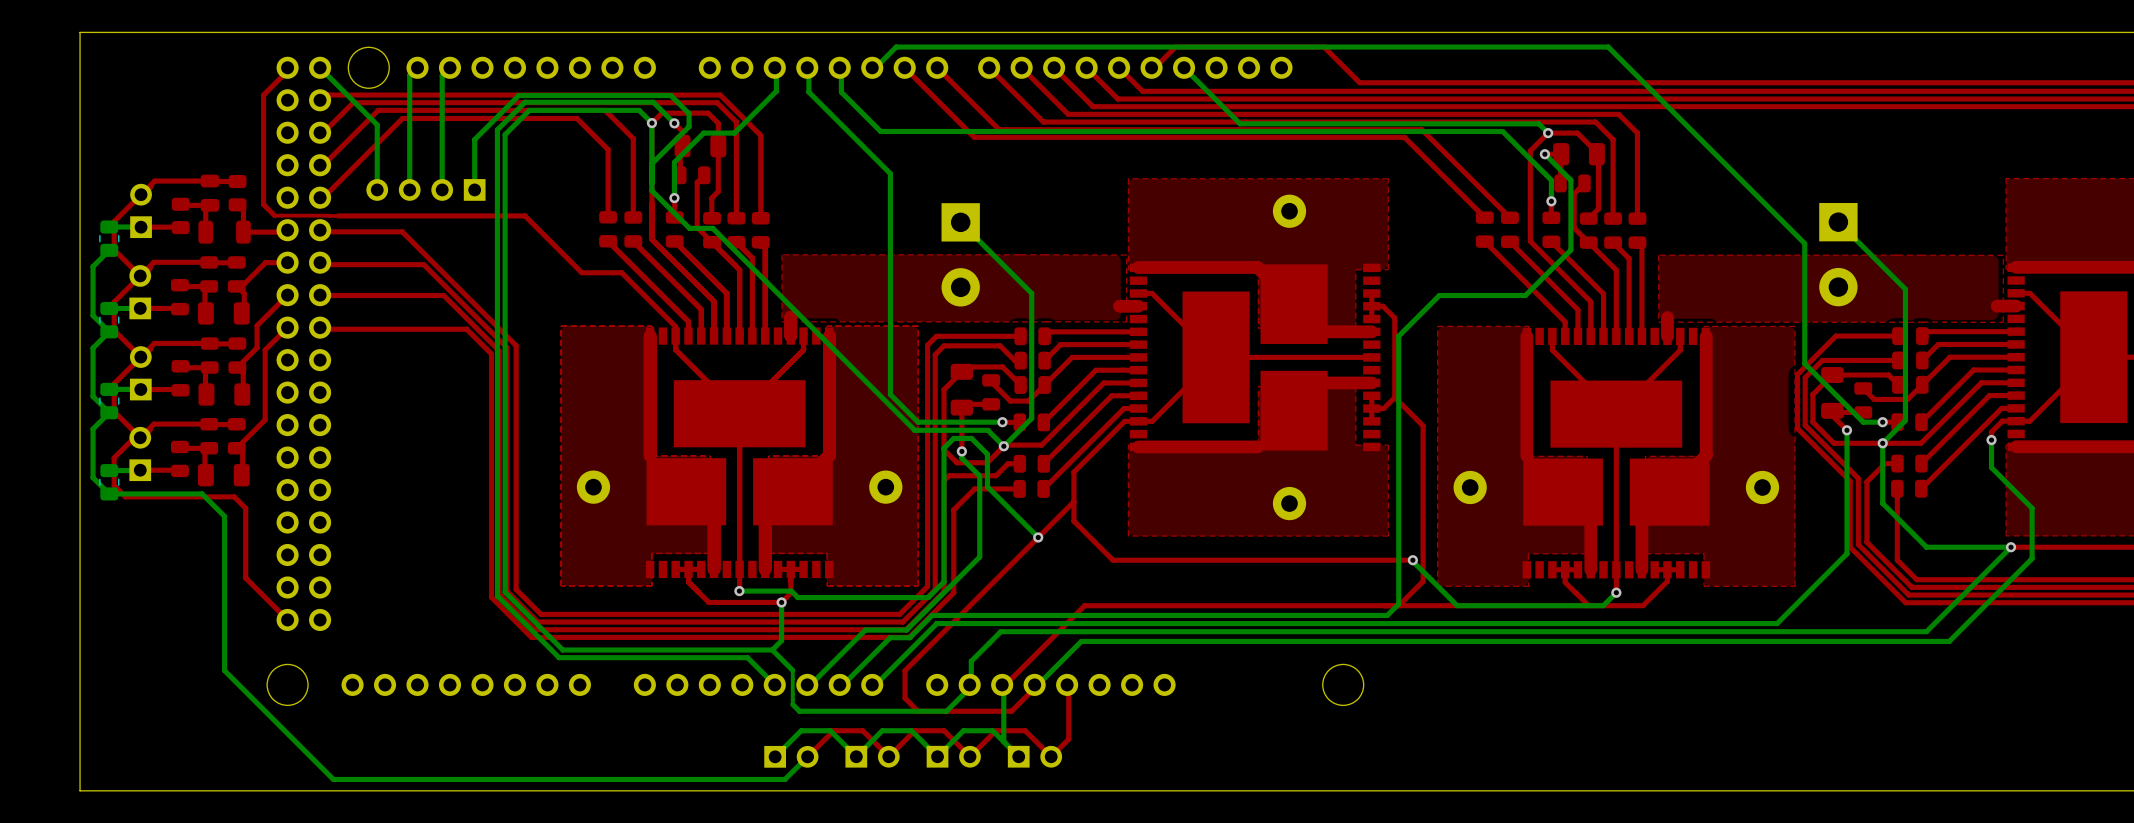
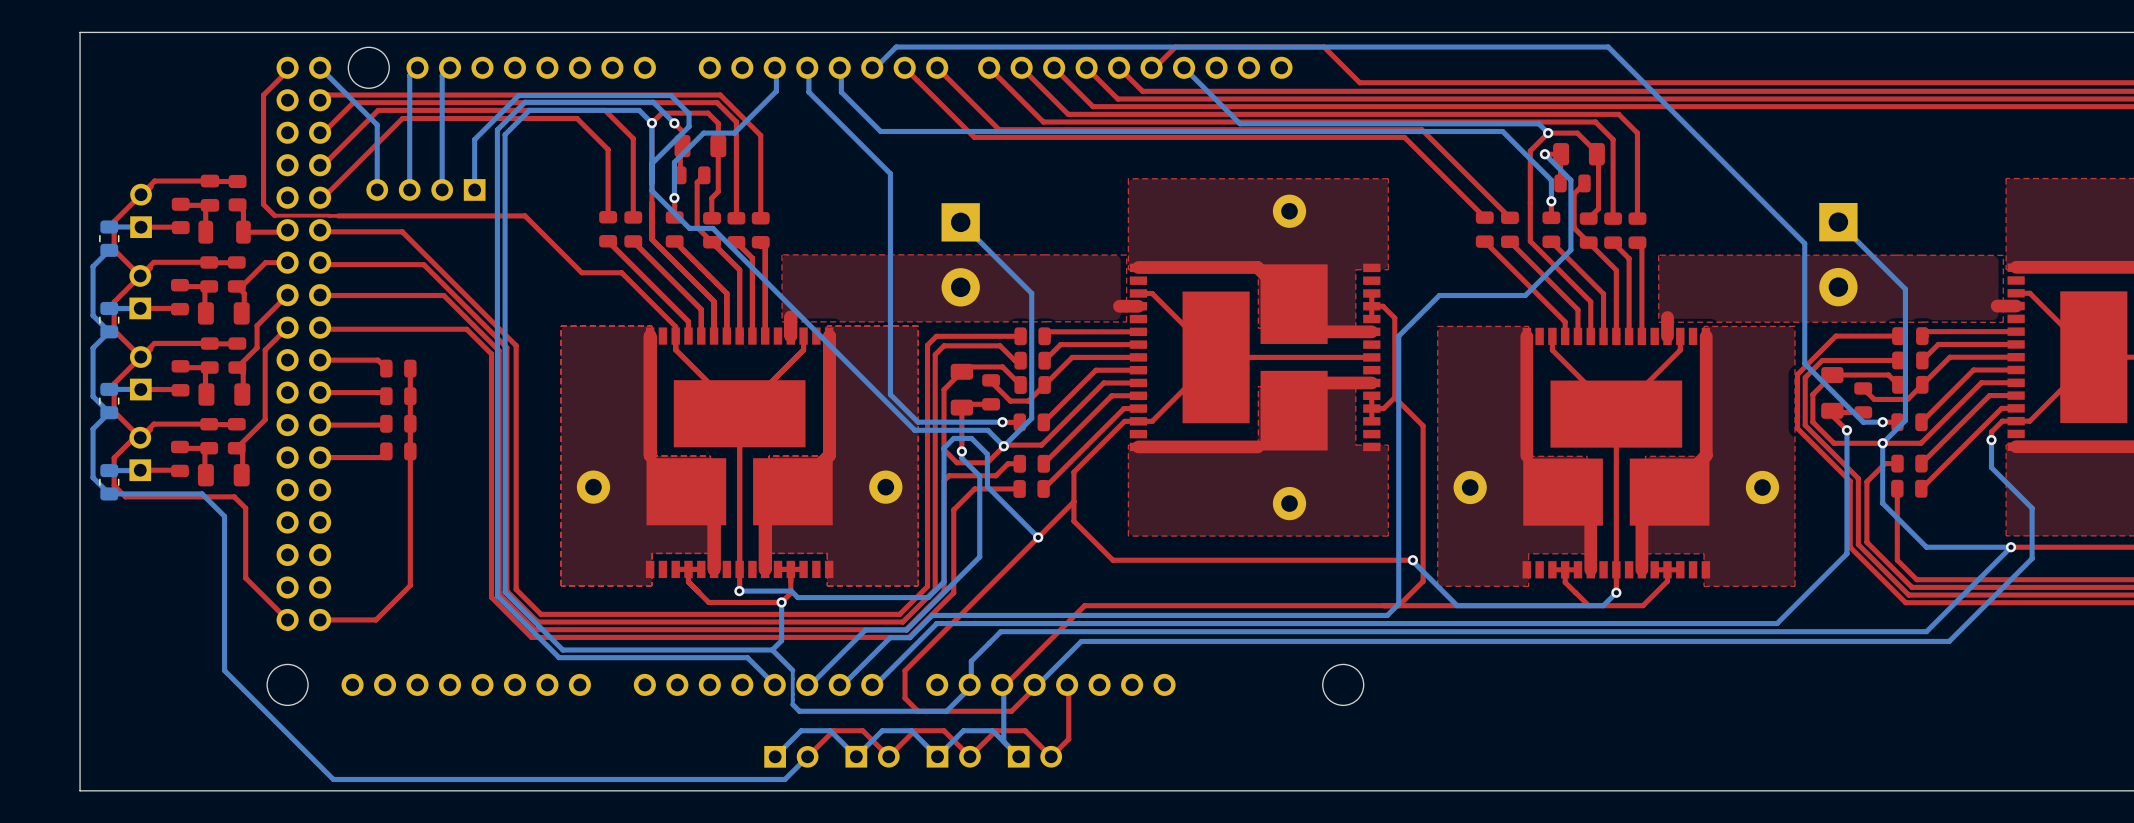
top track: none -> (320, 360) (377, 360) (386, 368)
part: none -> (398, 368)
top track: none -> (410, 368) (410, 585) (375, 619) (320, 619)
top track: none -> (320, 392) (382, 392) (386, 396)
part: none -> (398, 396)
top track: none -> (386, 423) (320, 425)
part: none -> (398, 423)
top track: none -> (386, 451) (380, 457) (320, 457)
part: none -> (398, 451)

